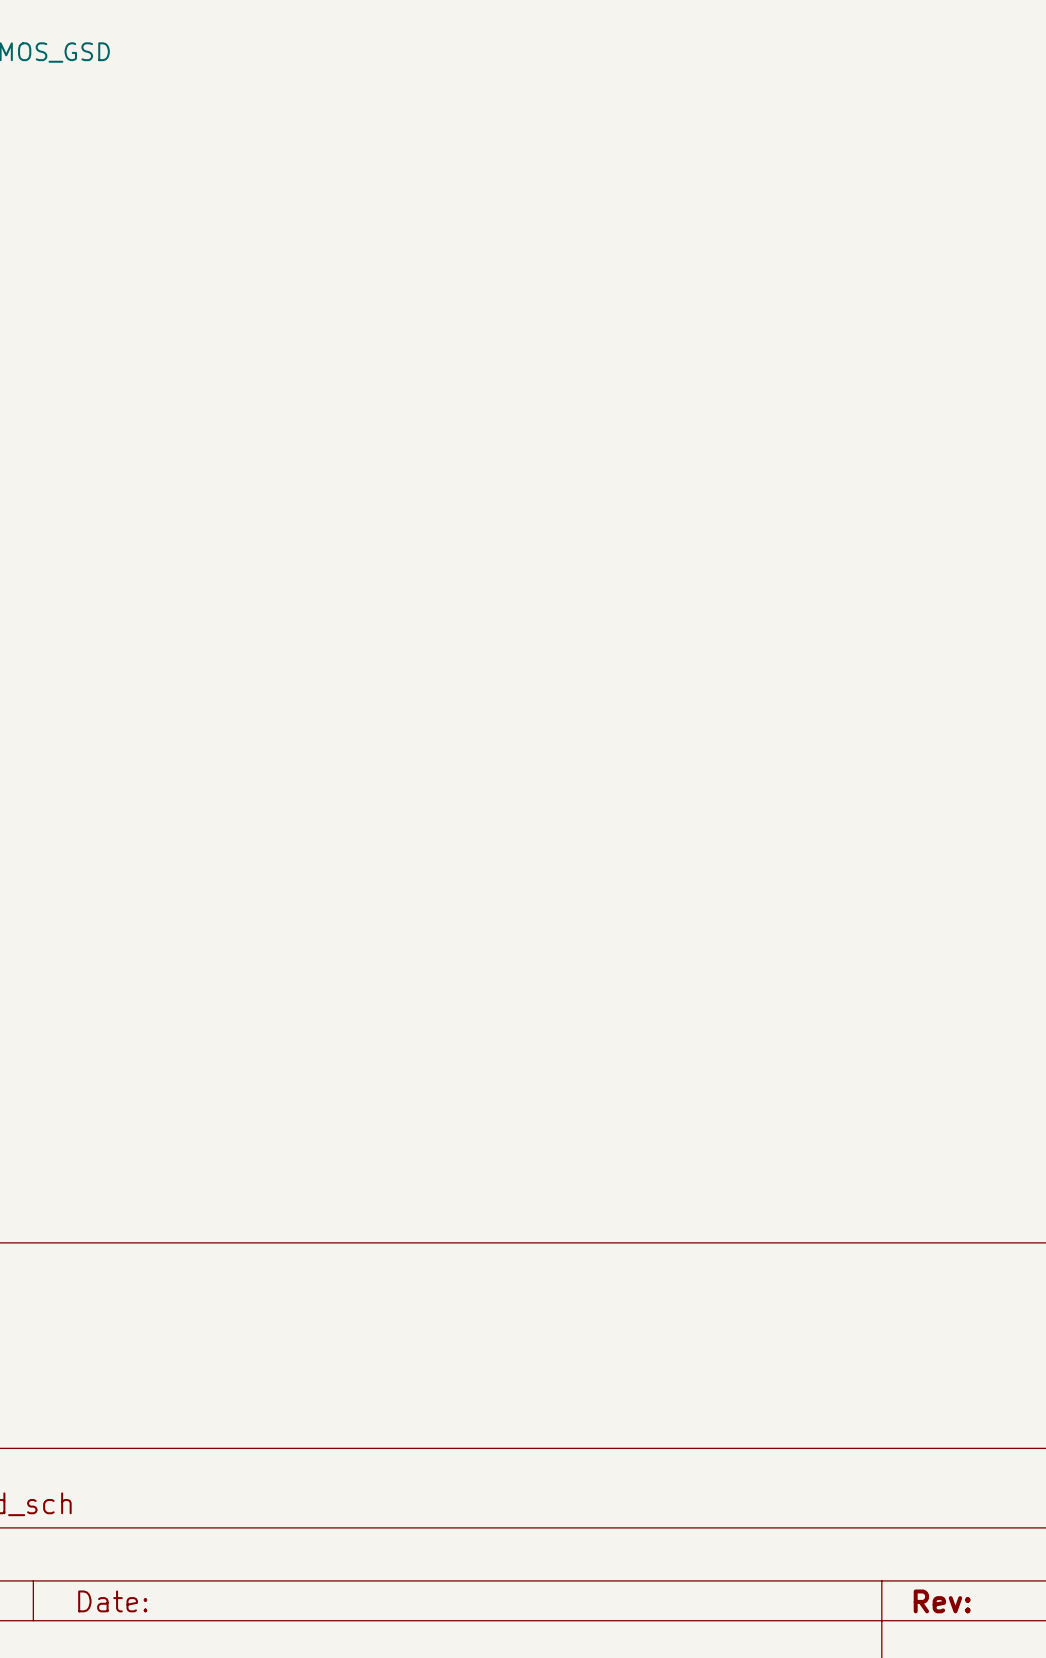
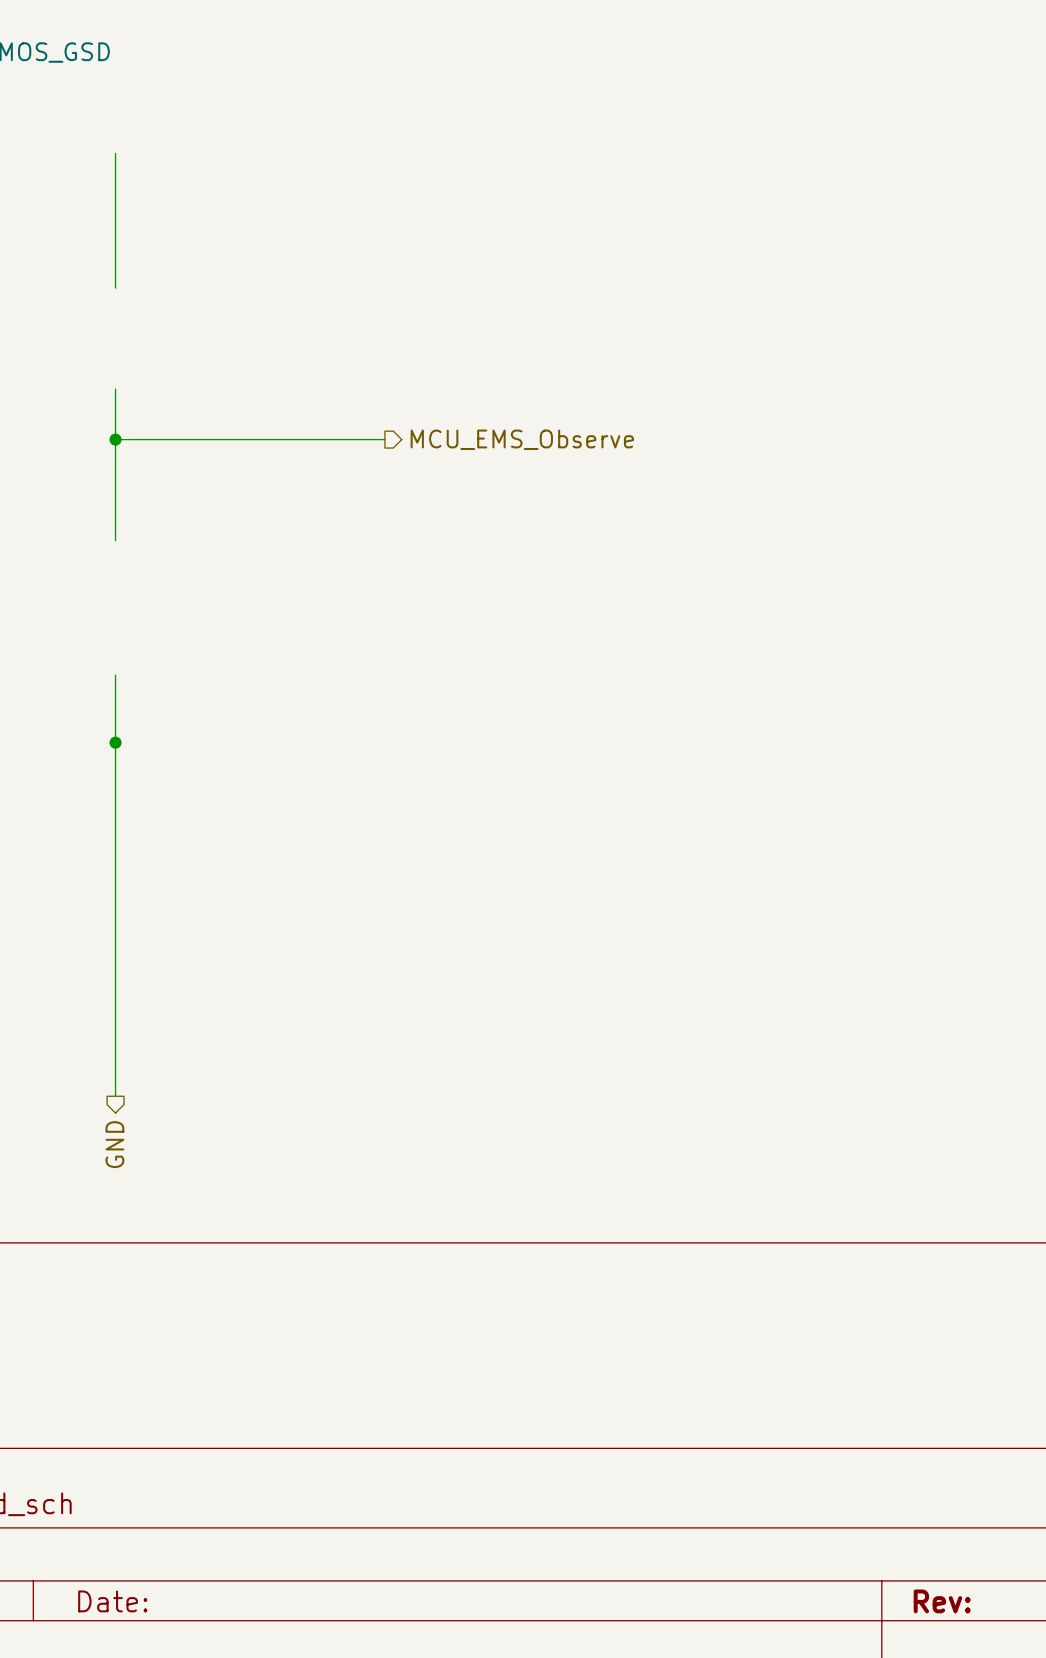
wire: none -> (115, 153) (115, 288)
wire: none -> (115, 389) (115, 540)
wire: none -> (115, 439) (384, 439)
junction: none -> (115, 439)
hierarchical label: none -> MCU_EMS_Observe (522, 439)
wire: none -> (115, 675) (115, 1096)
junction: none -> (115, 742)
hierarchical label: none -> GND (114, 1144)

